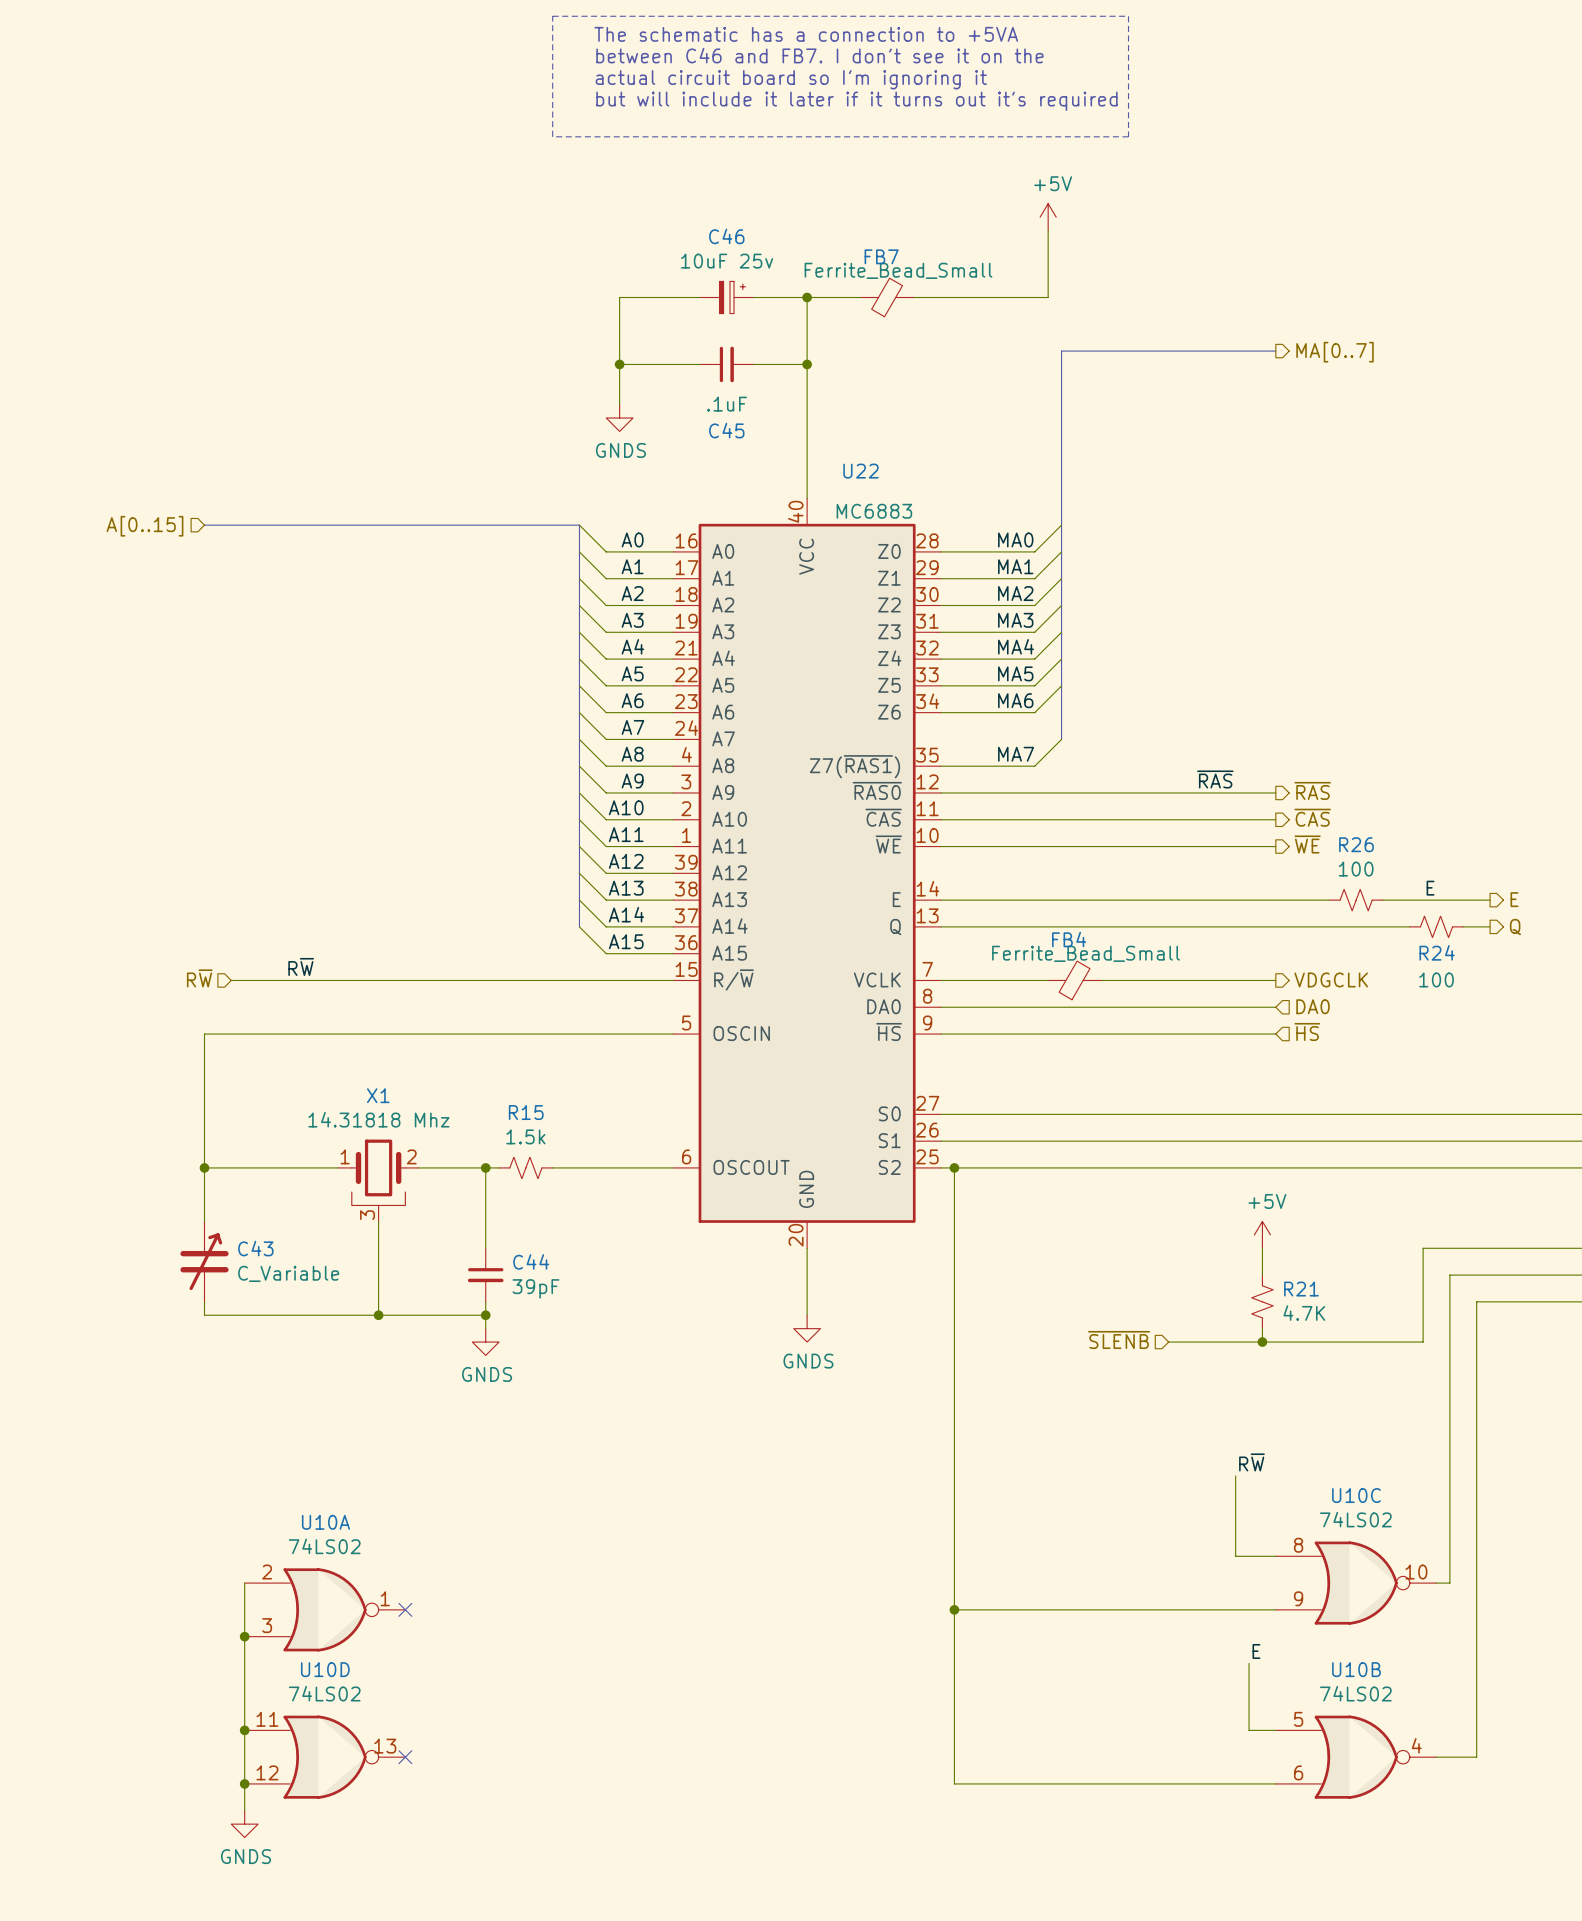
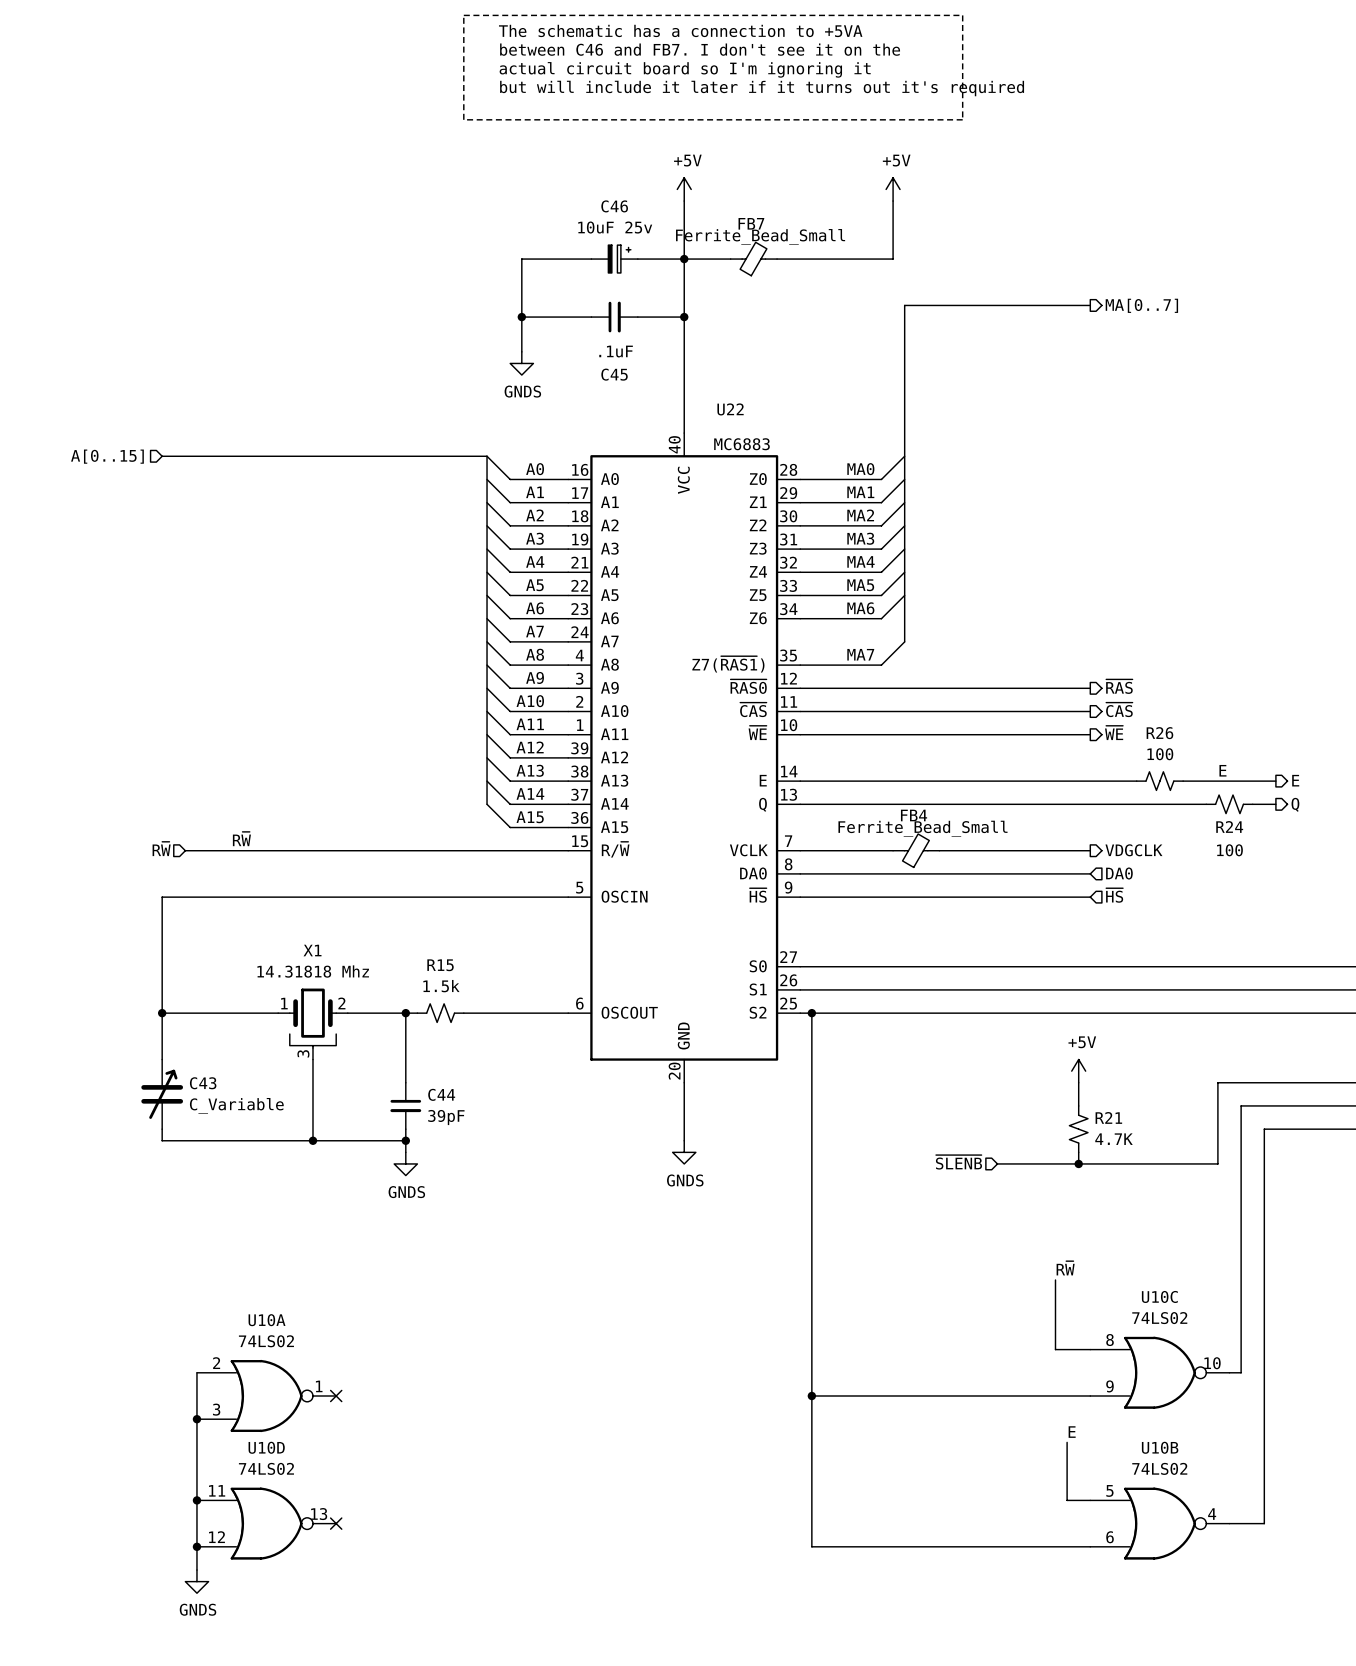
power symbol: none -> +5V (684, 189)
wire: none -> (684, 201) (684, 259)
label: ~{RAS} (1215, 779) -> none

